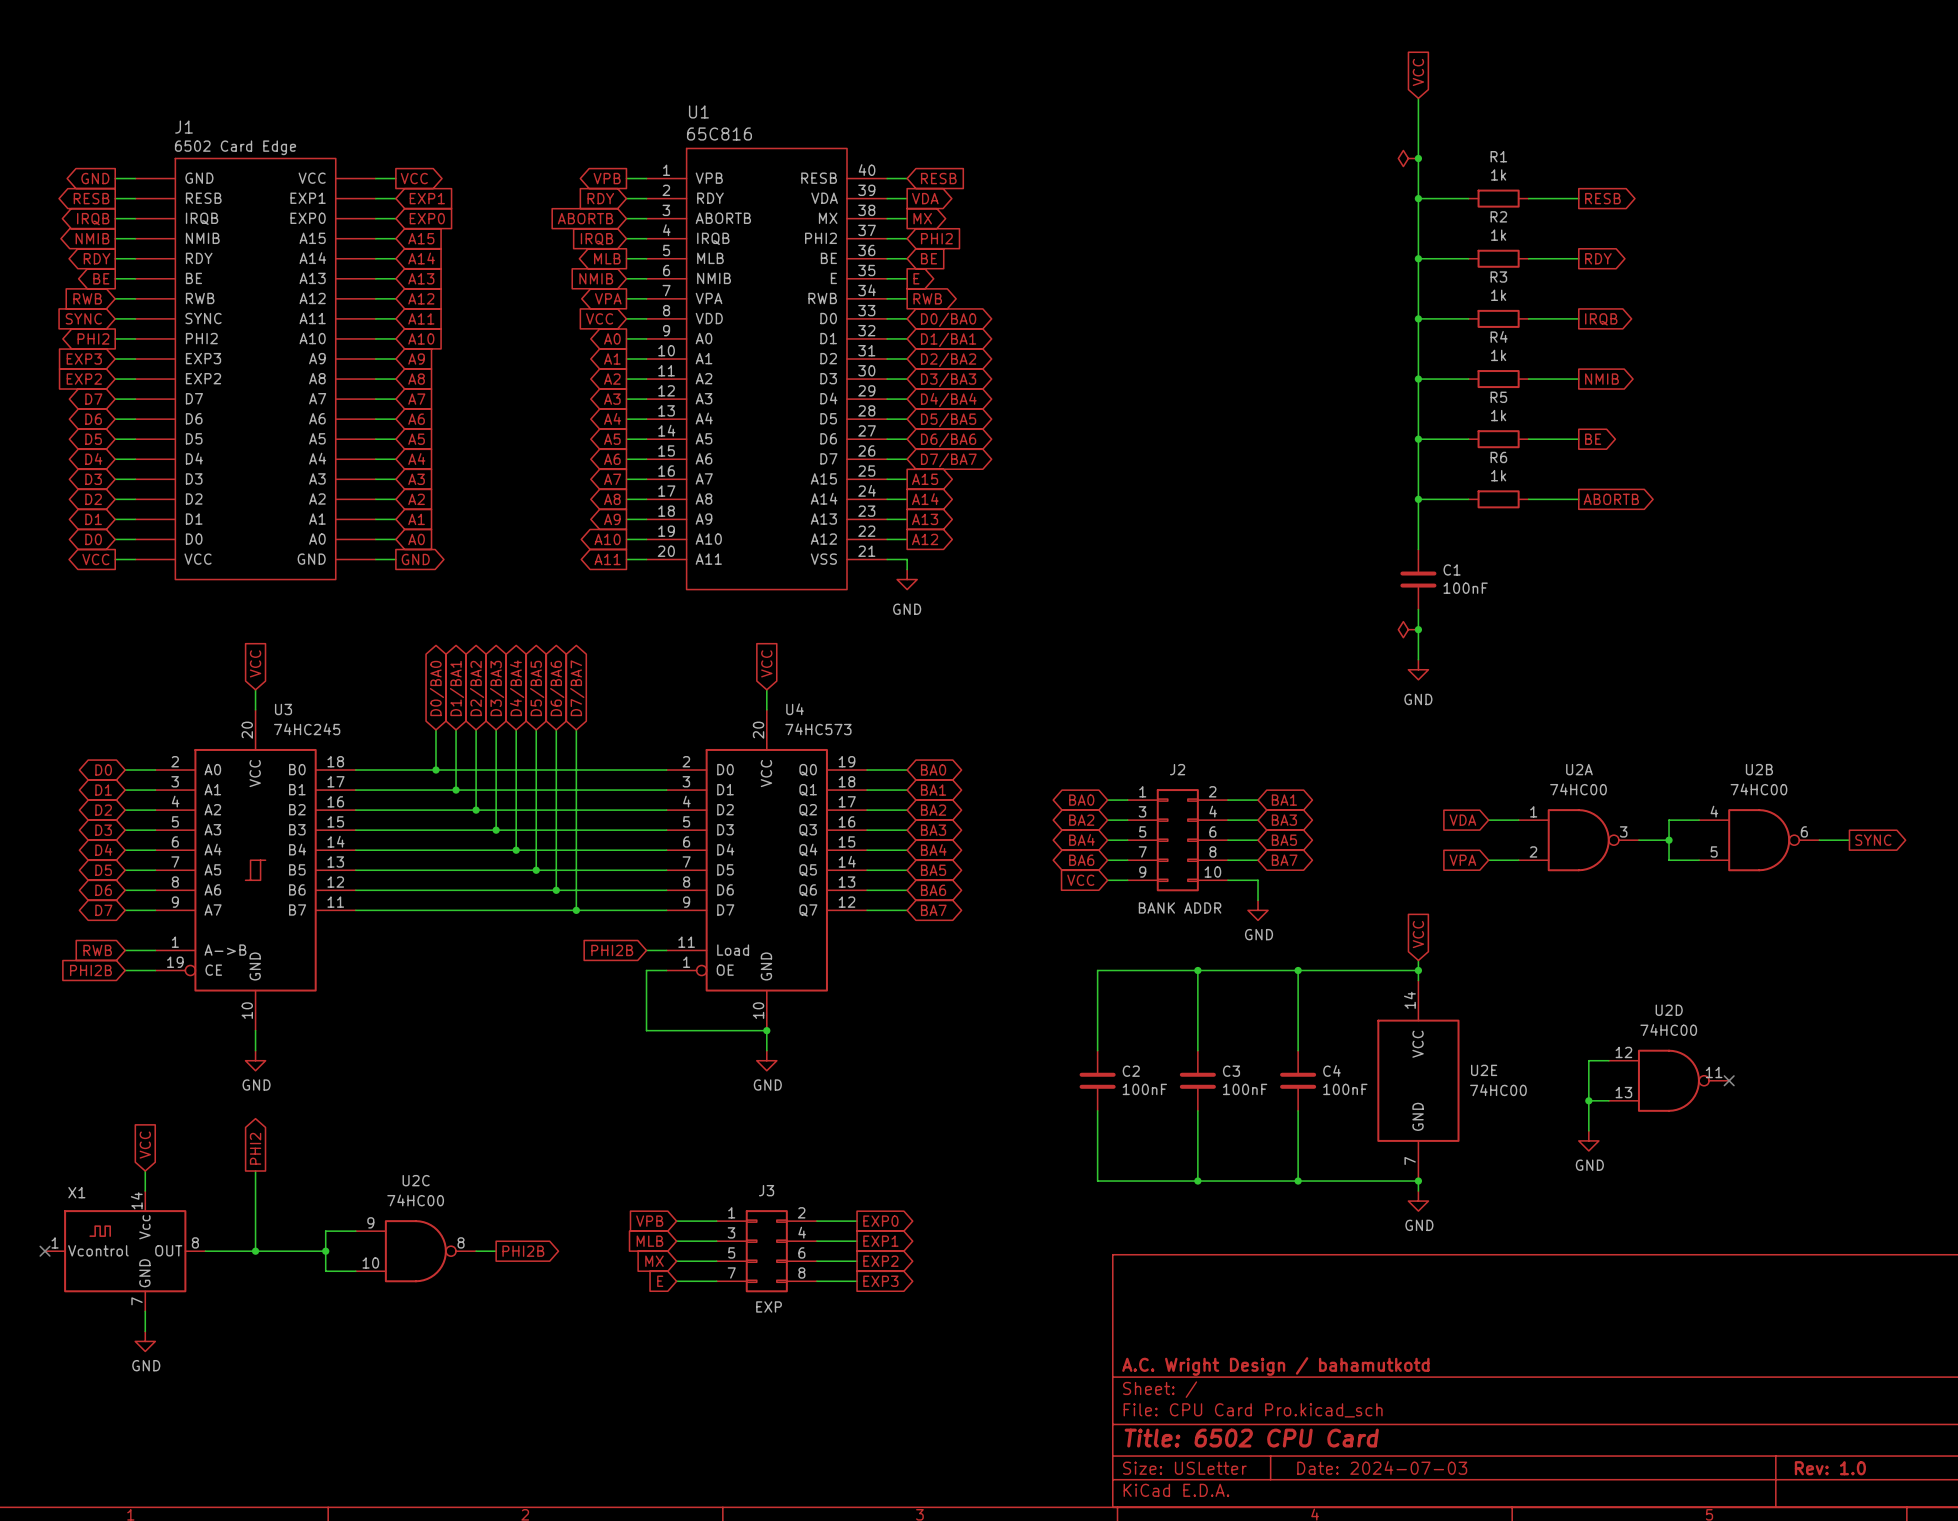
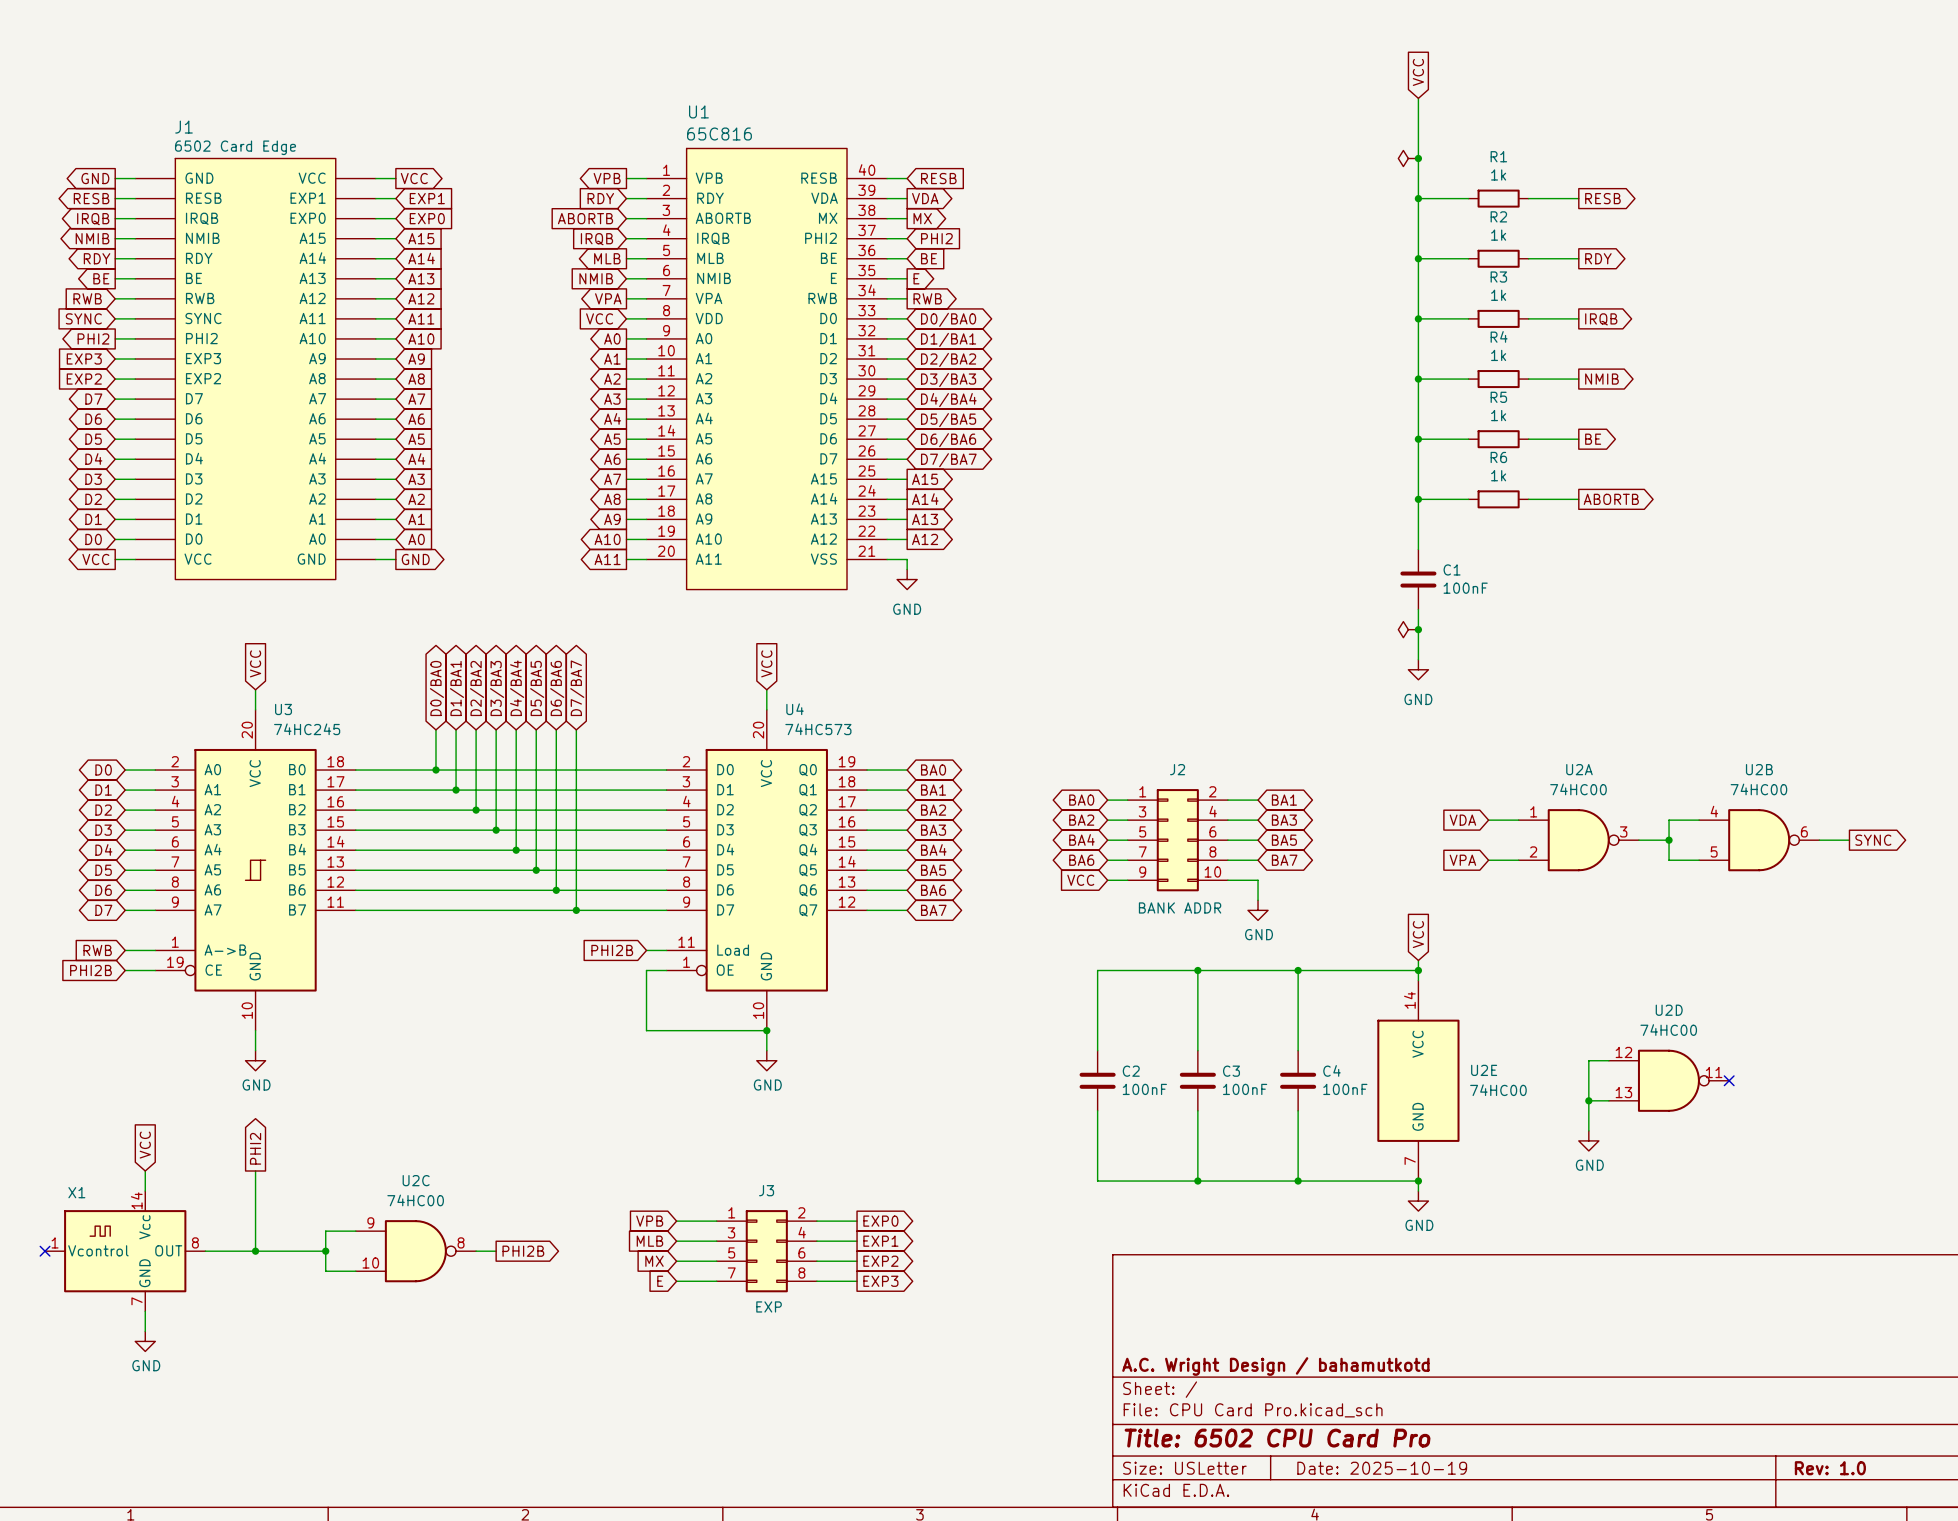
title block: Title: 6502 CPU Card (1251, 1438) -> Title: 6502 CPU Card Pro (1277, 1438)
title block: Date: 2024-07-03 (1382, 1467) -> Date: 2025-10-19 (1382, 1468)

